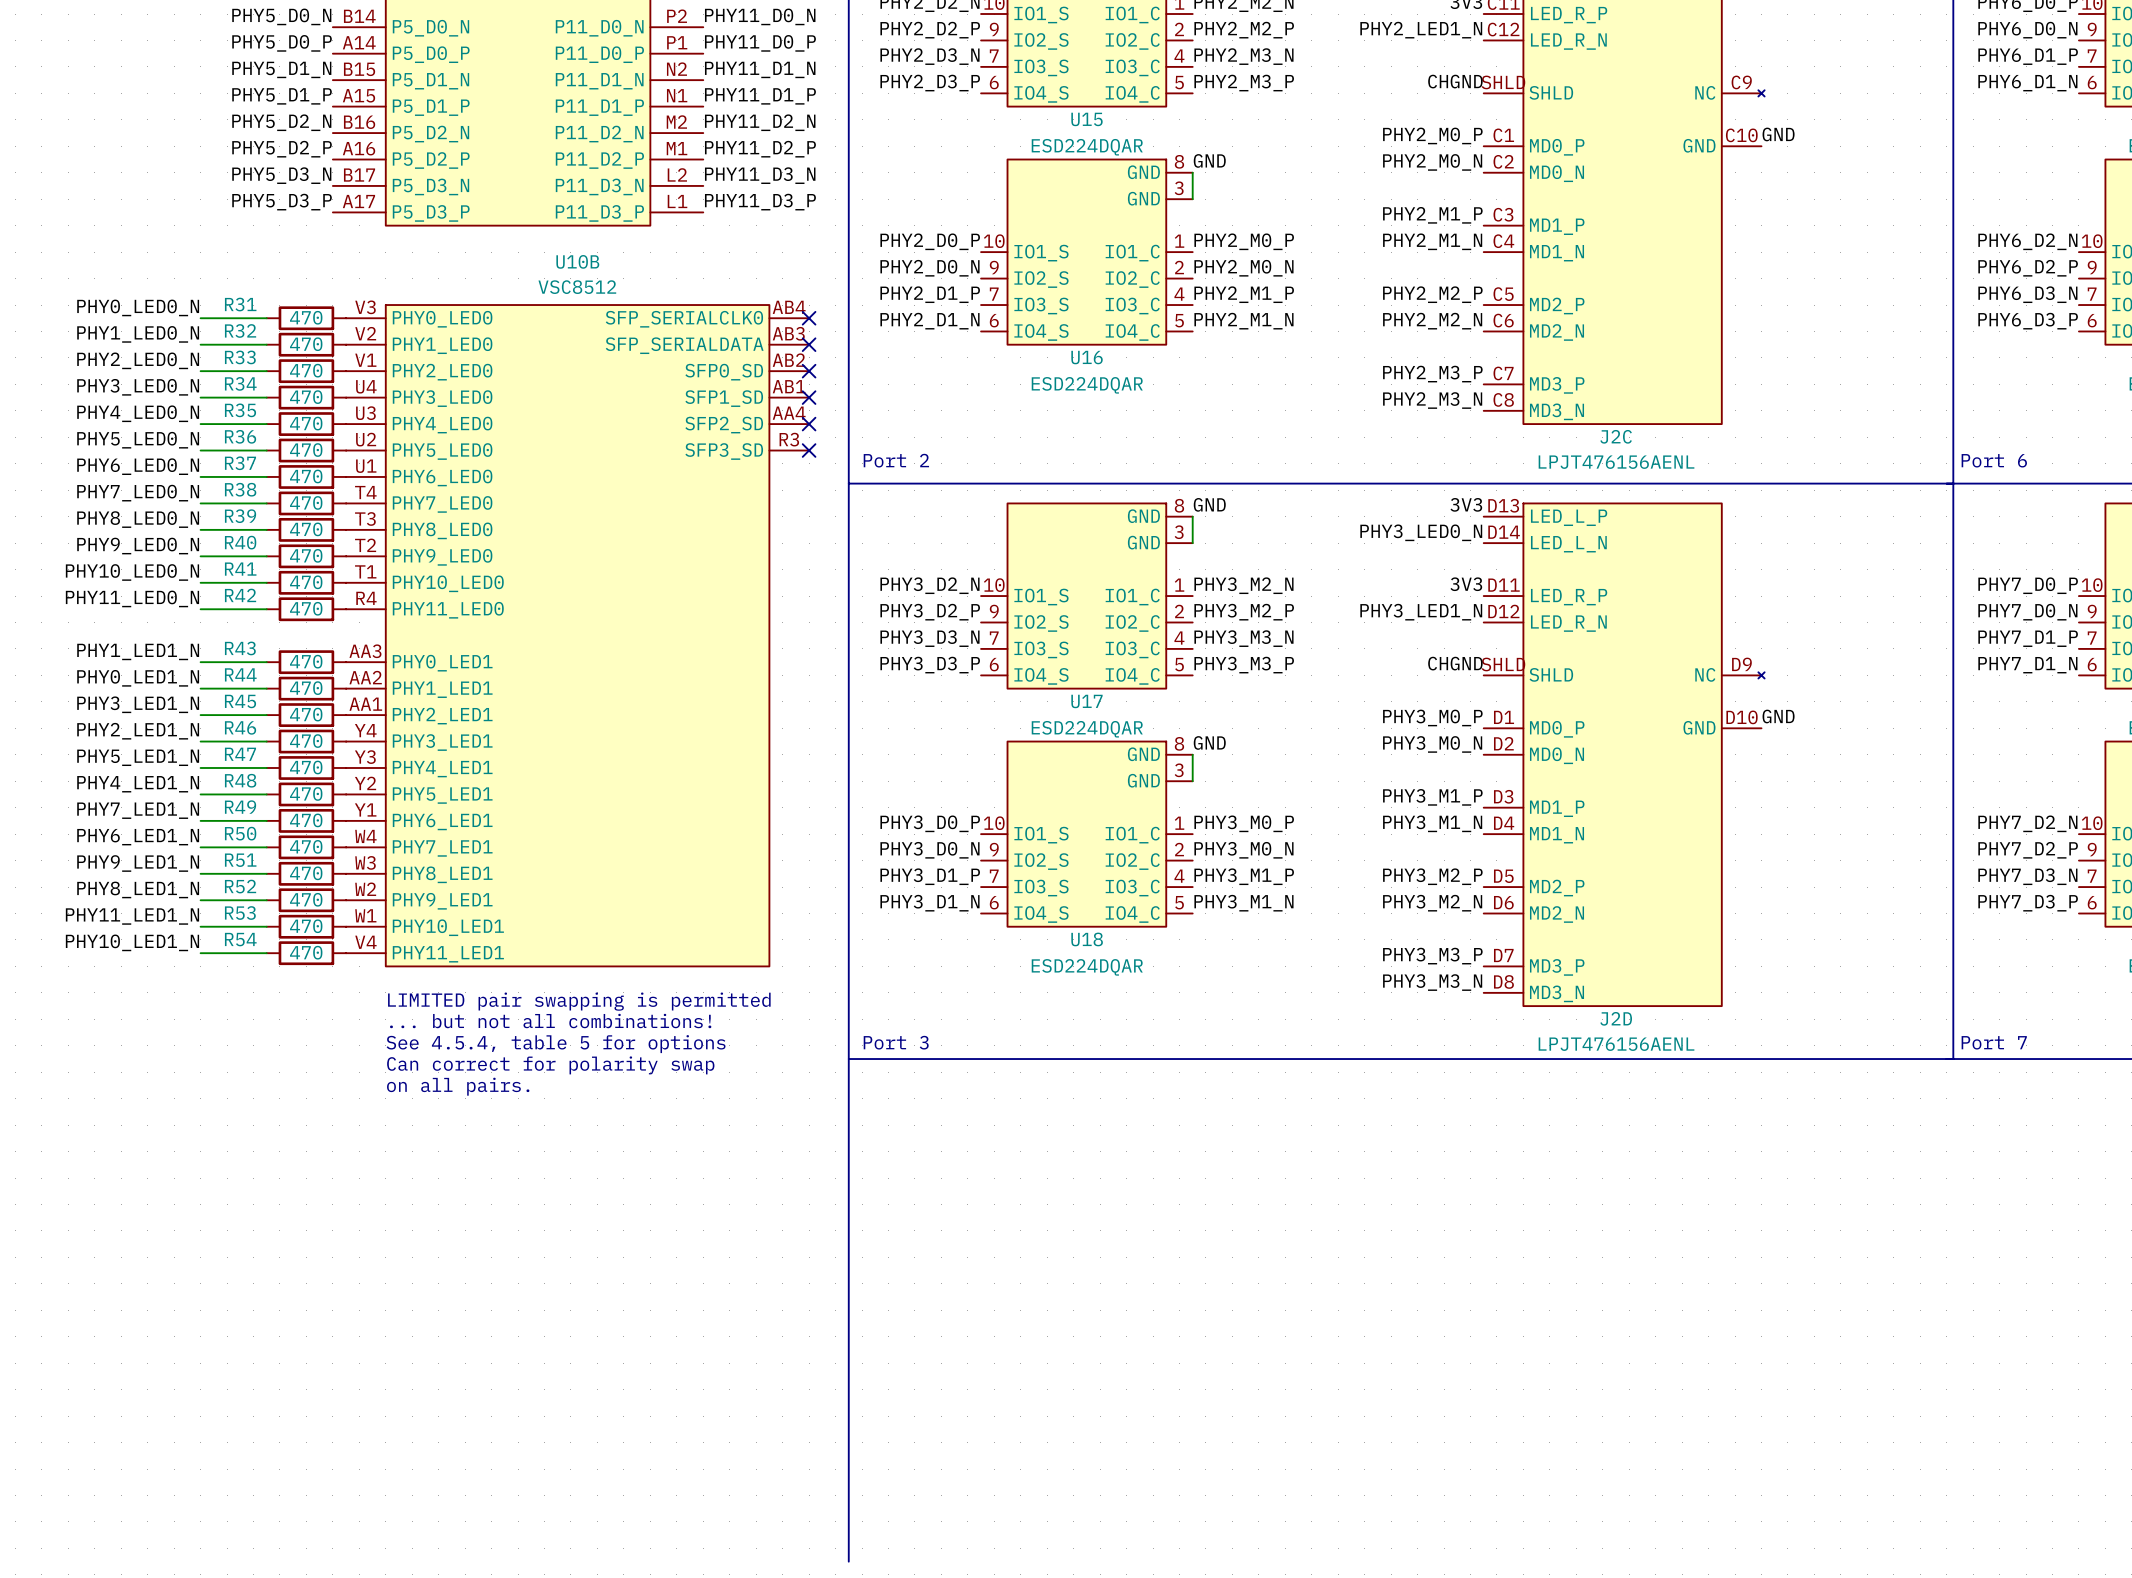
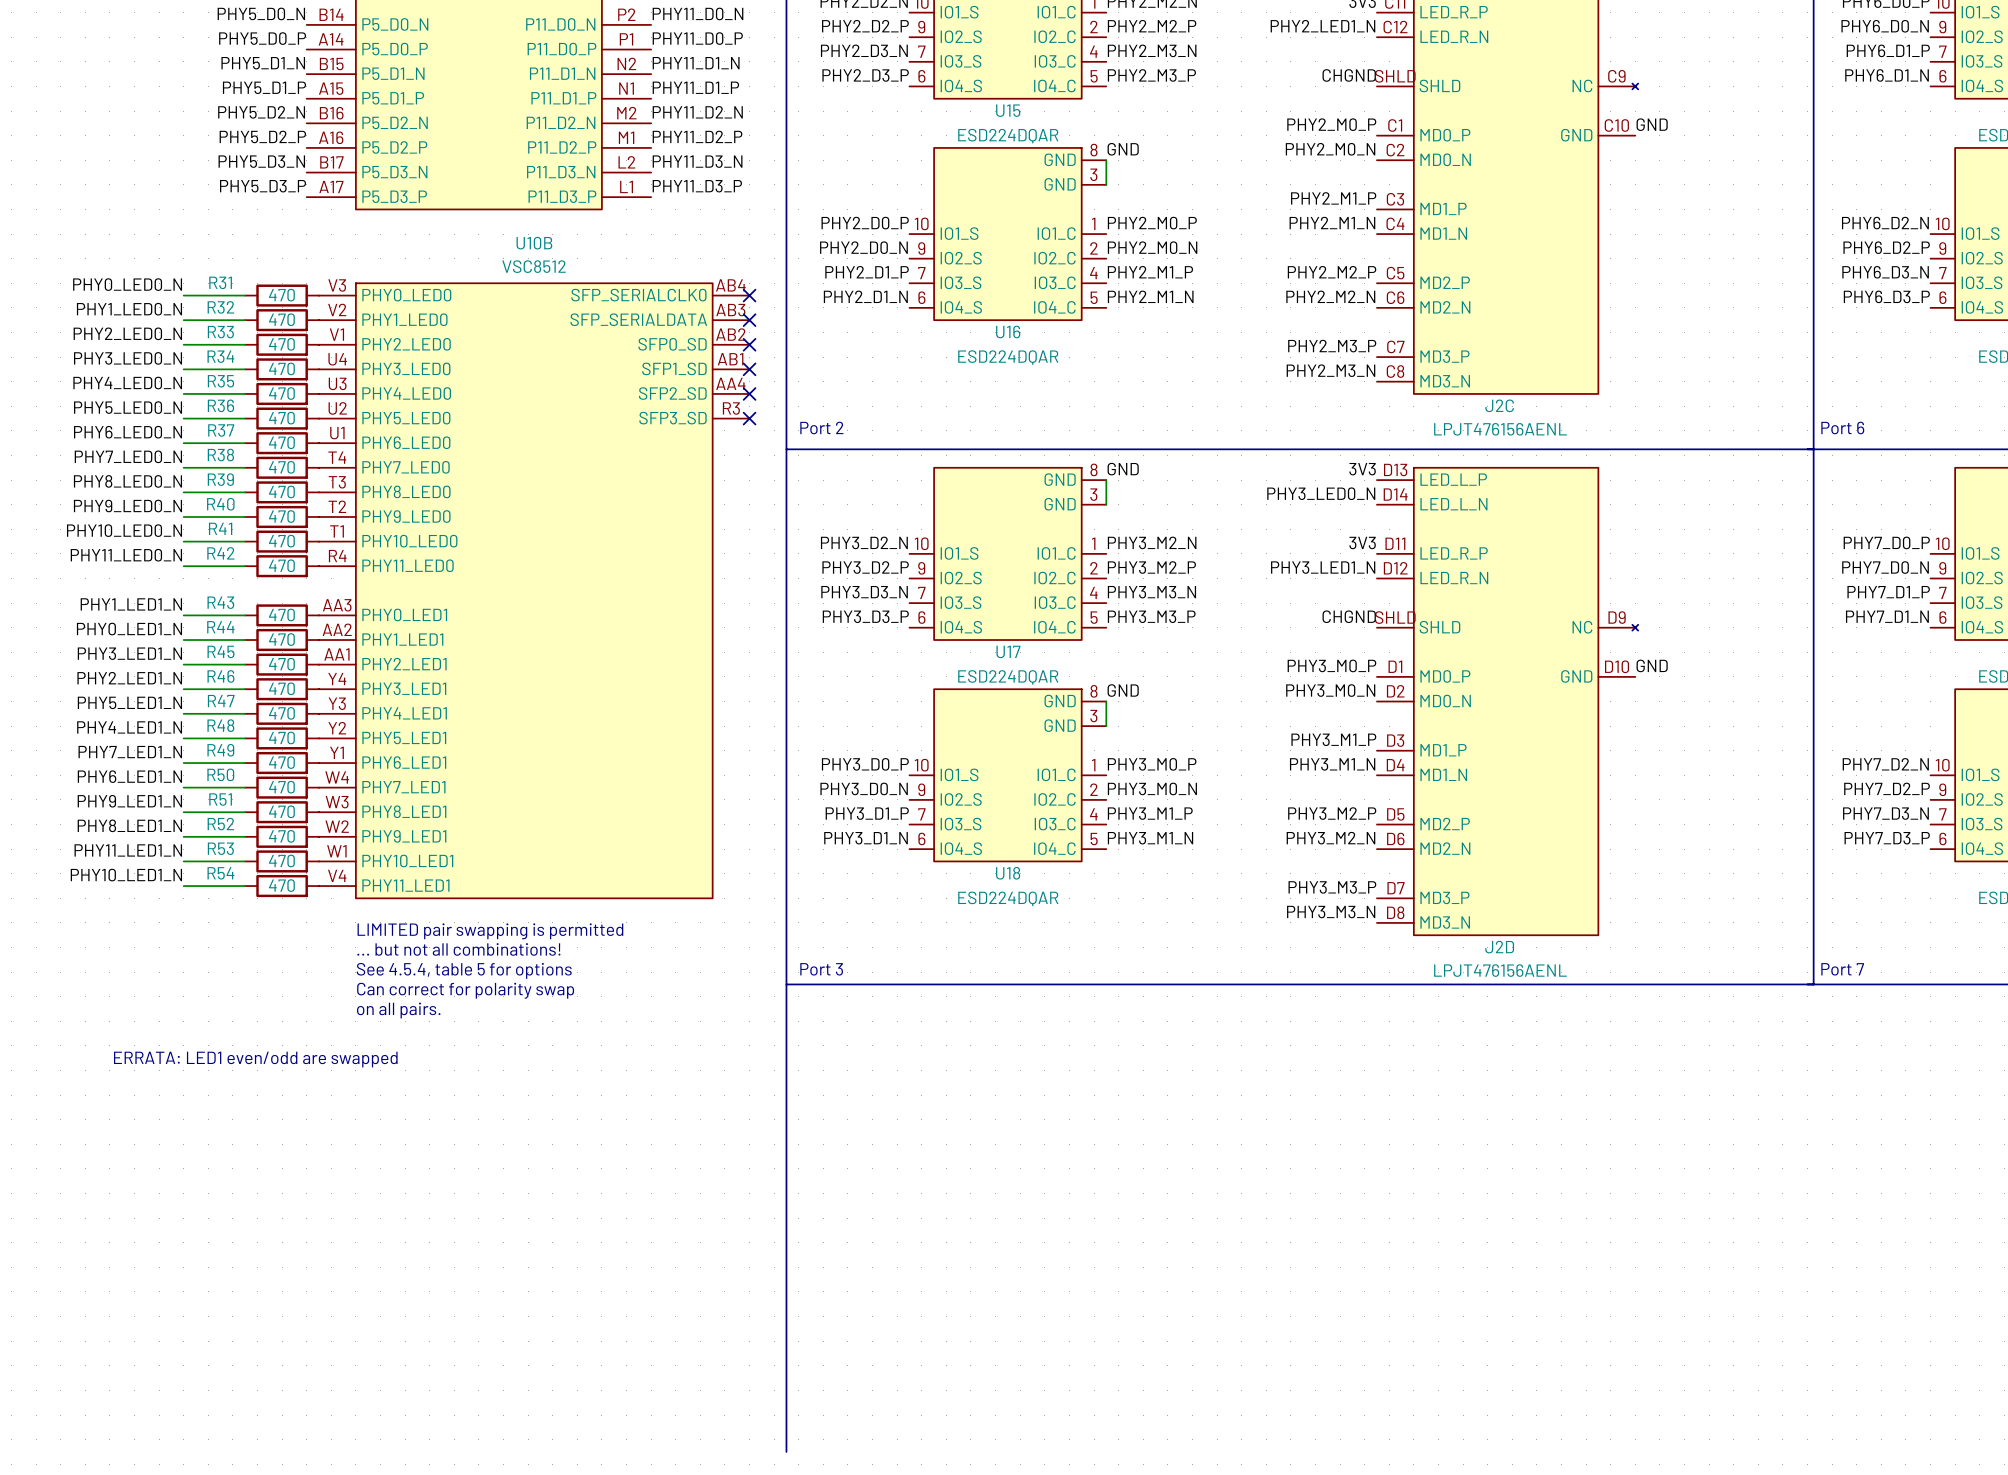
text: none -> ERRATA: LED1 even/odd are swapped (255, 1059)

